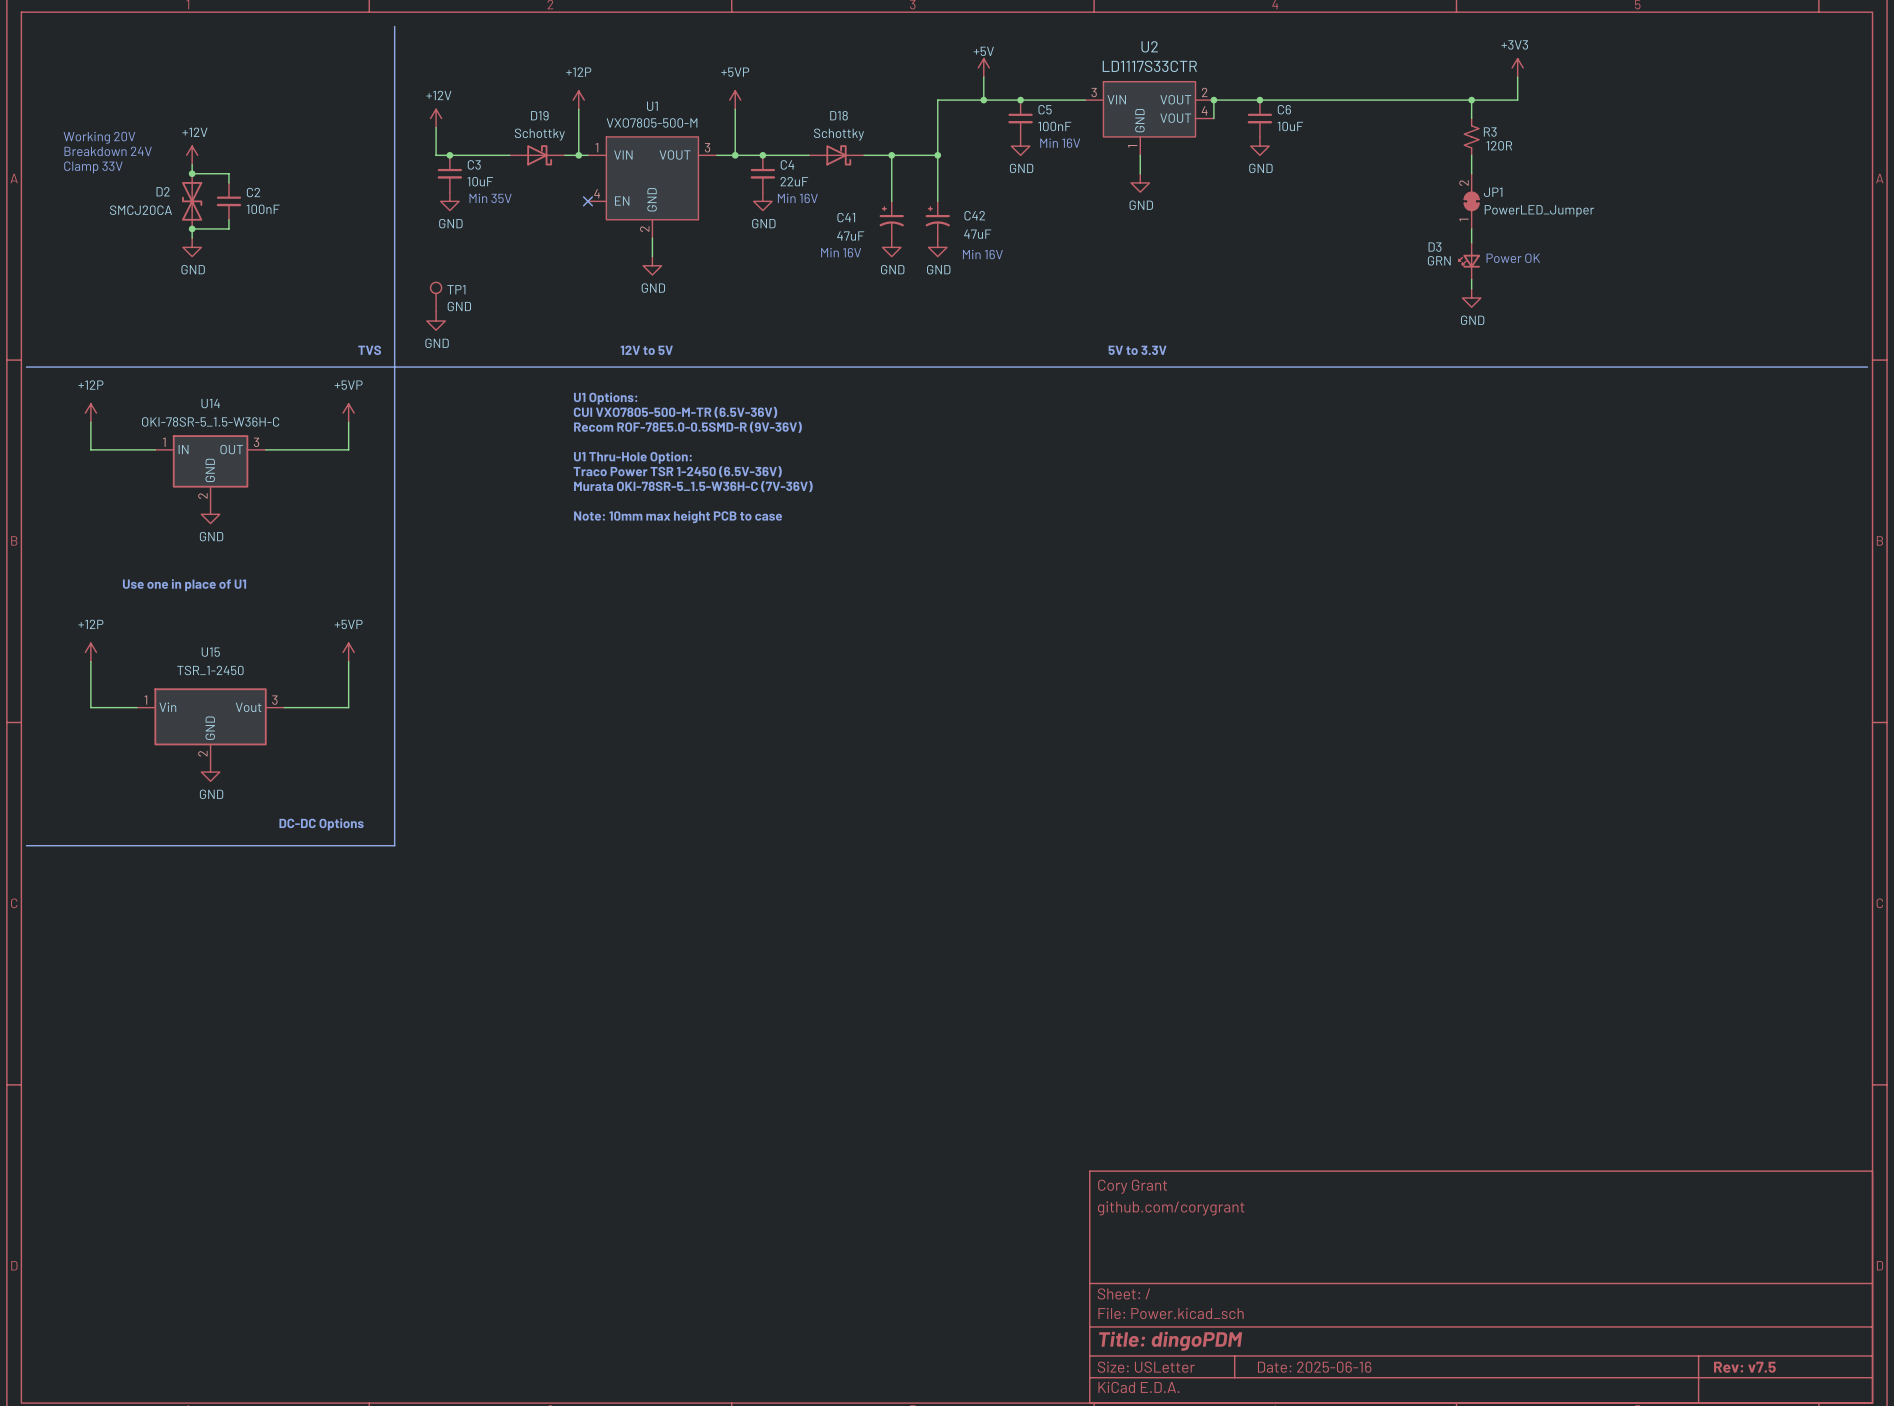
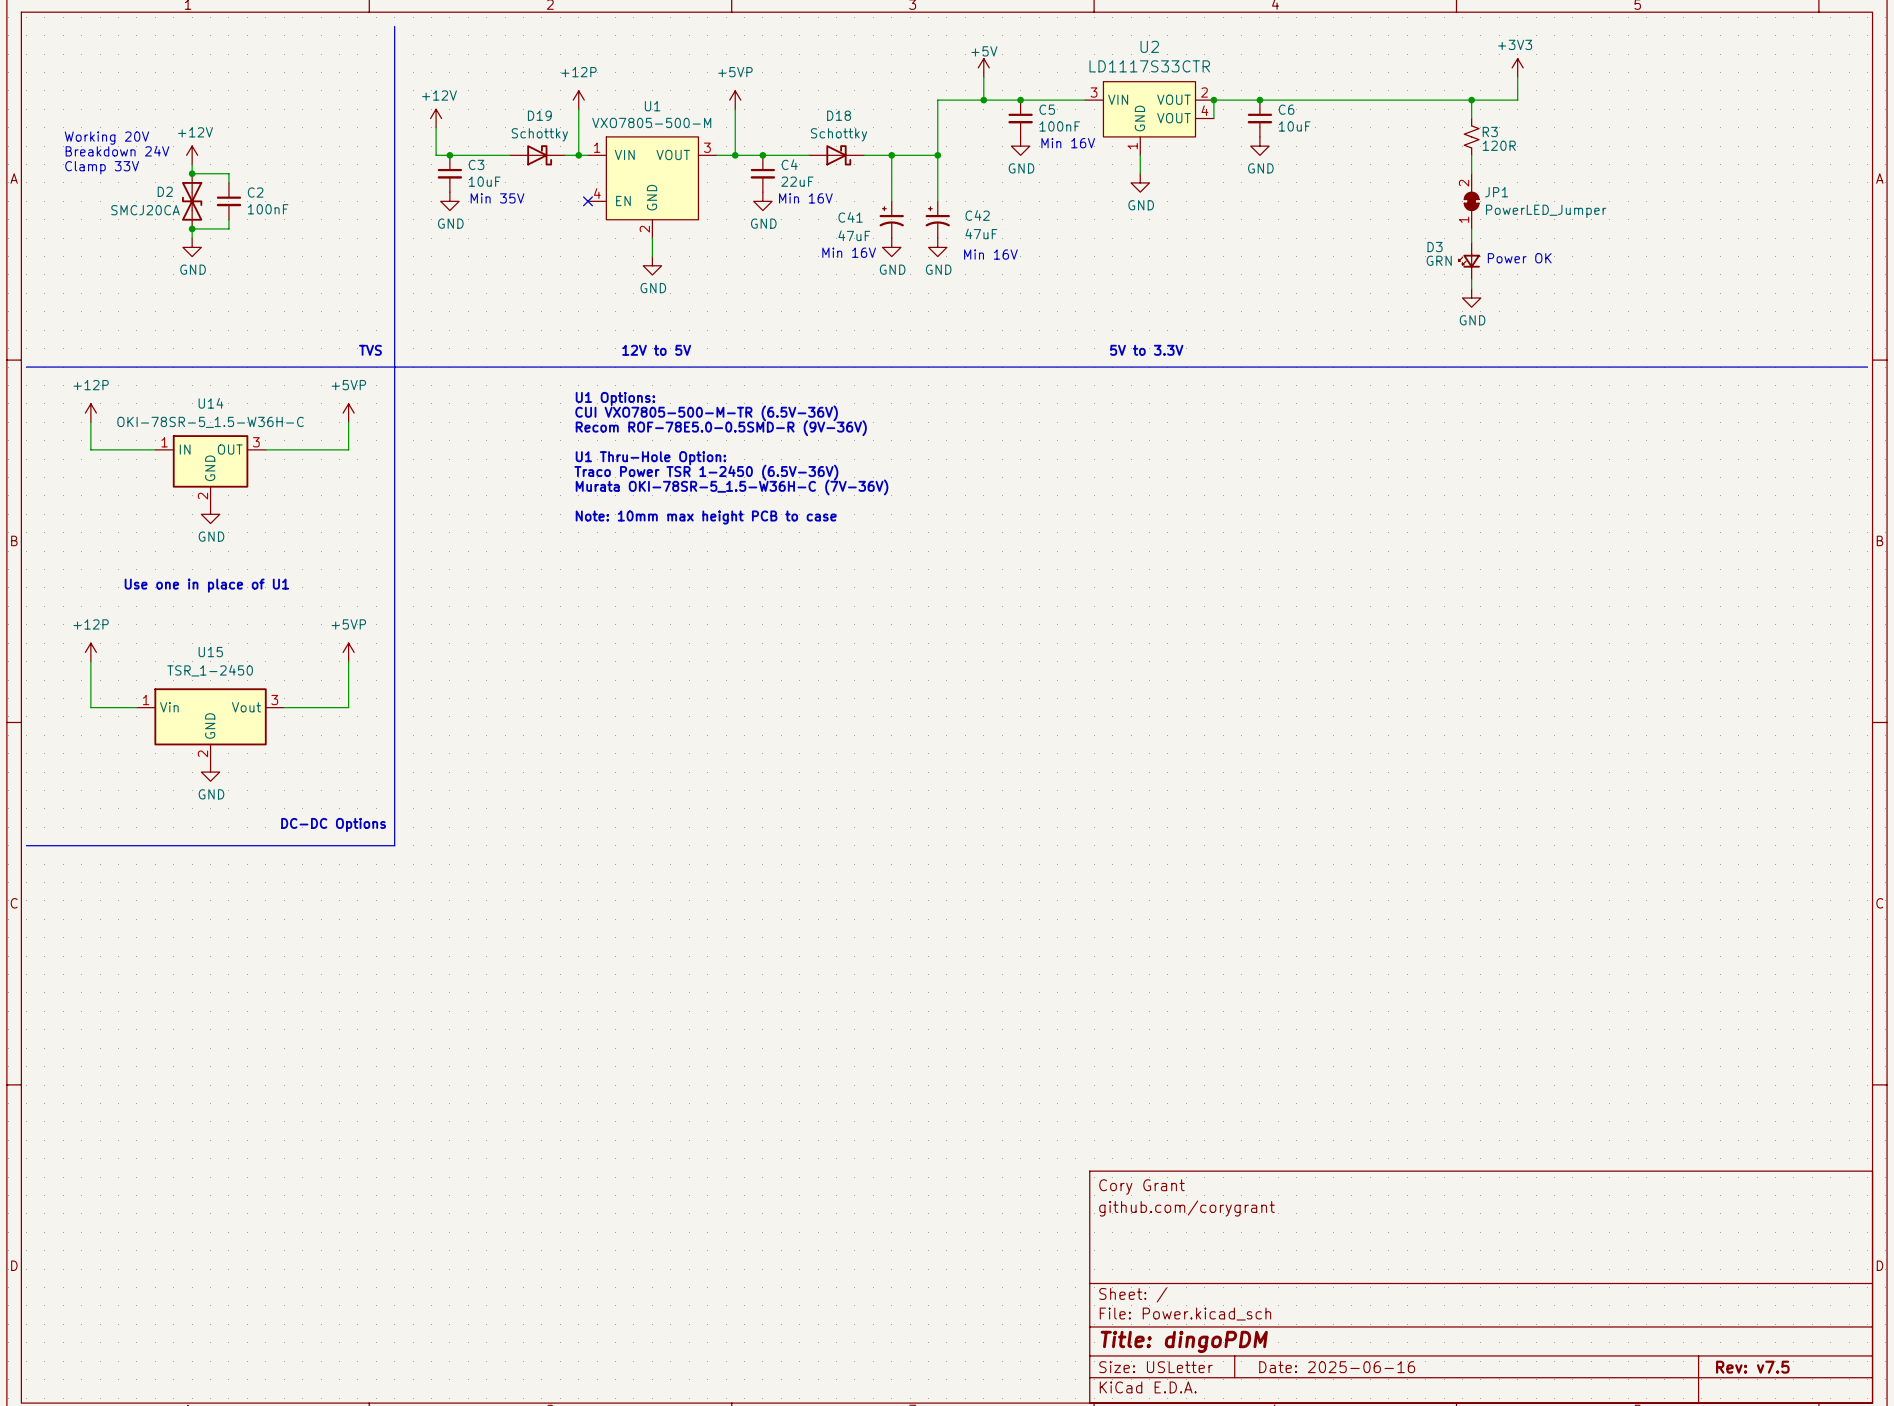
TP1: GND (436, 297) -> none
power symbol: GND (436, 321) -> none

